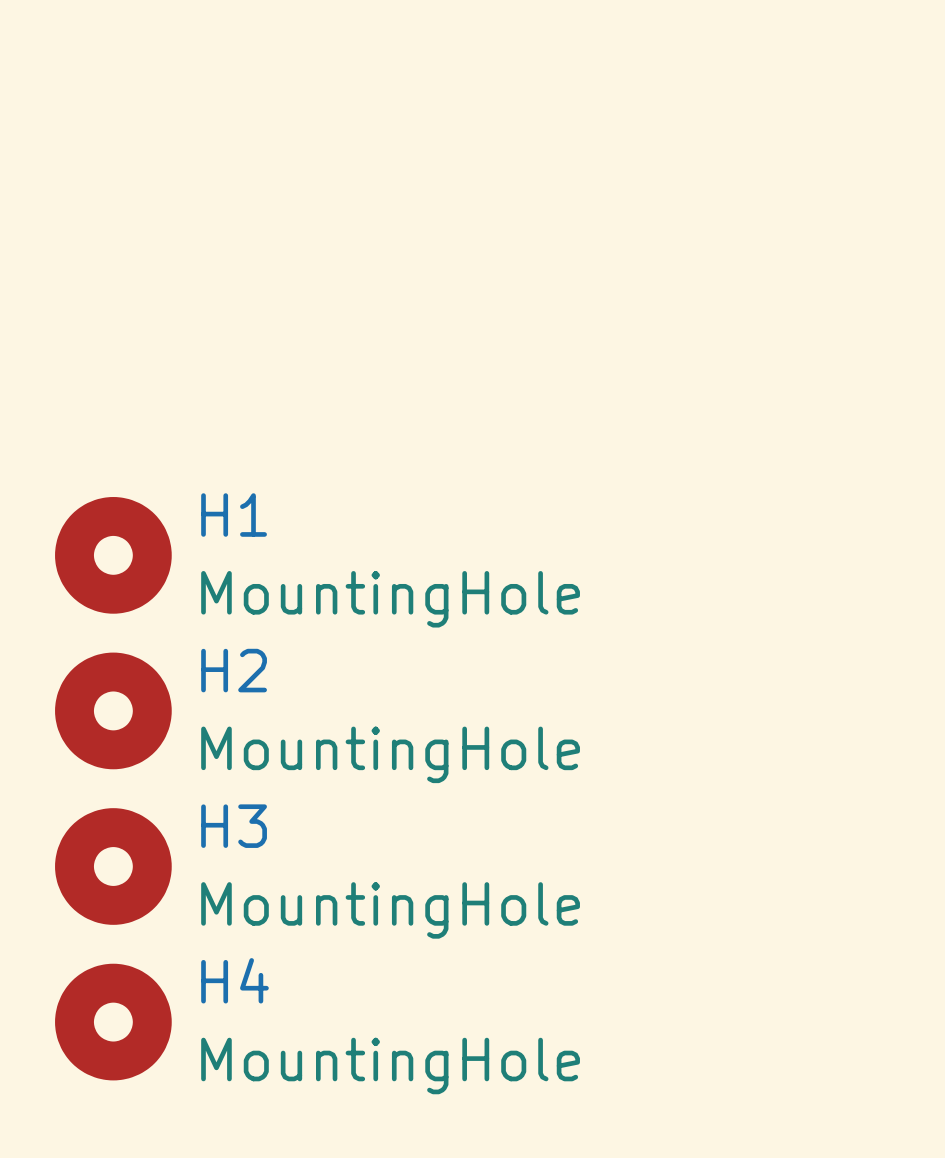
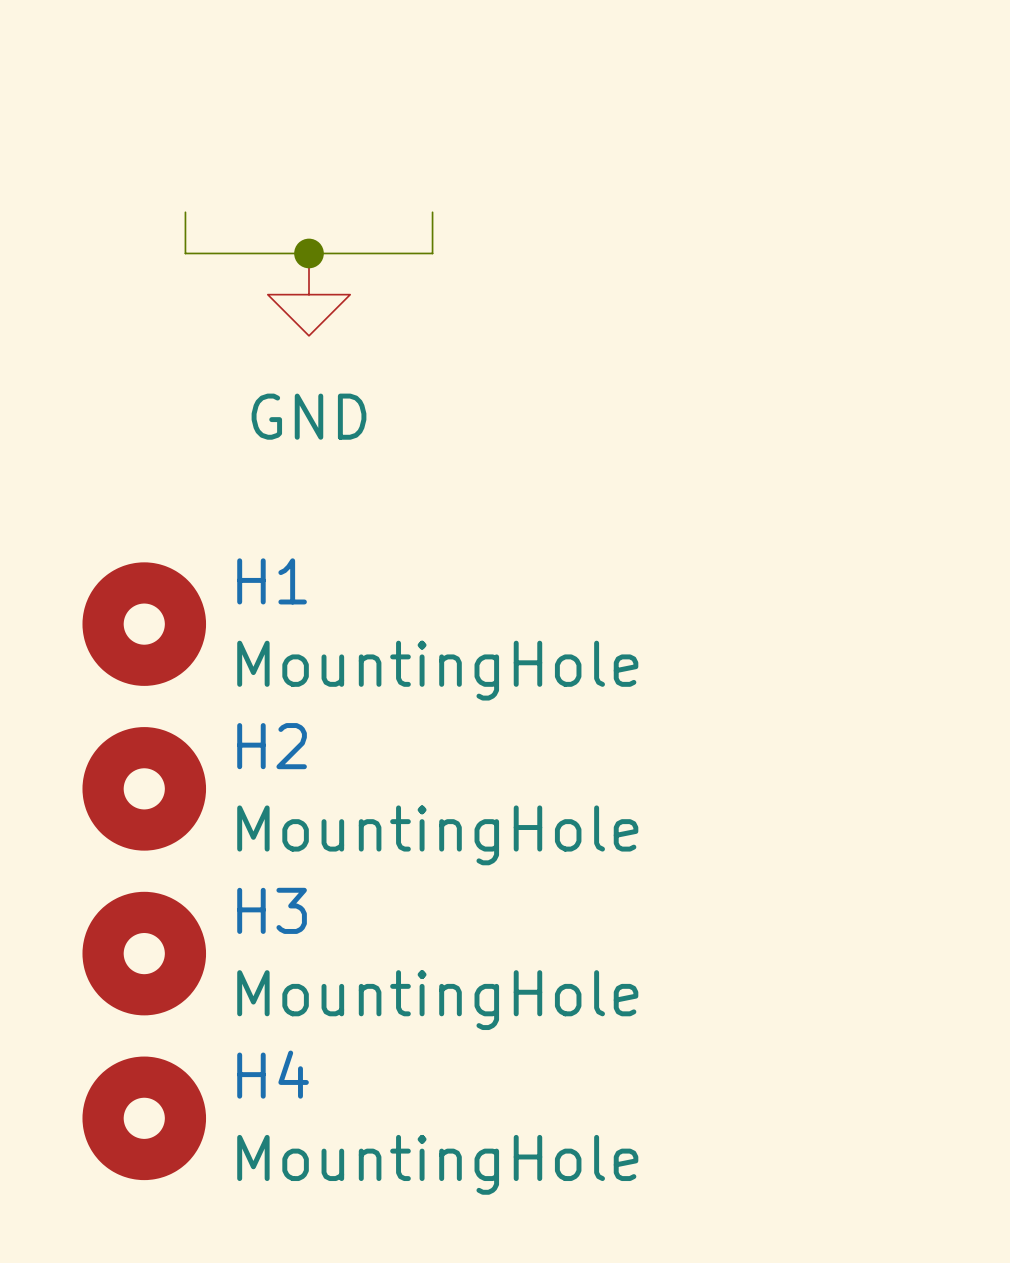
wire: none -> (185, 212) (185, 253) (432, 253) (432, 212)
junction: none -> (309, 253)
power symbol: none -> GND (309, 294)

